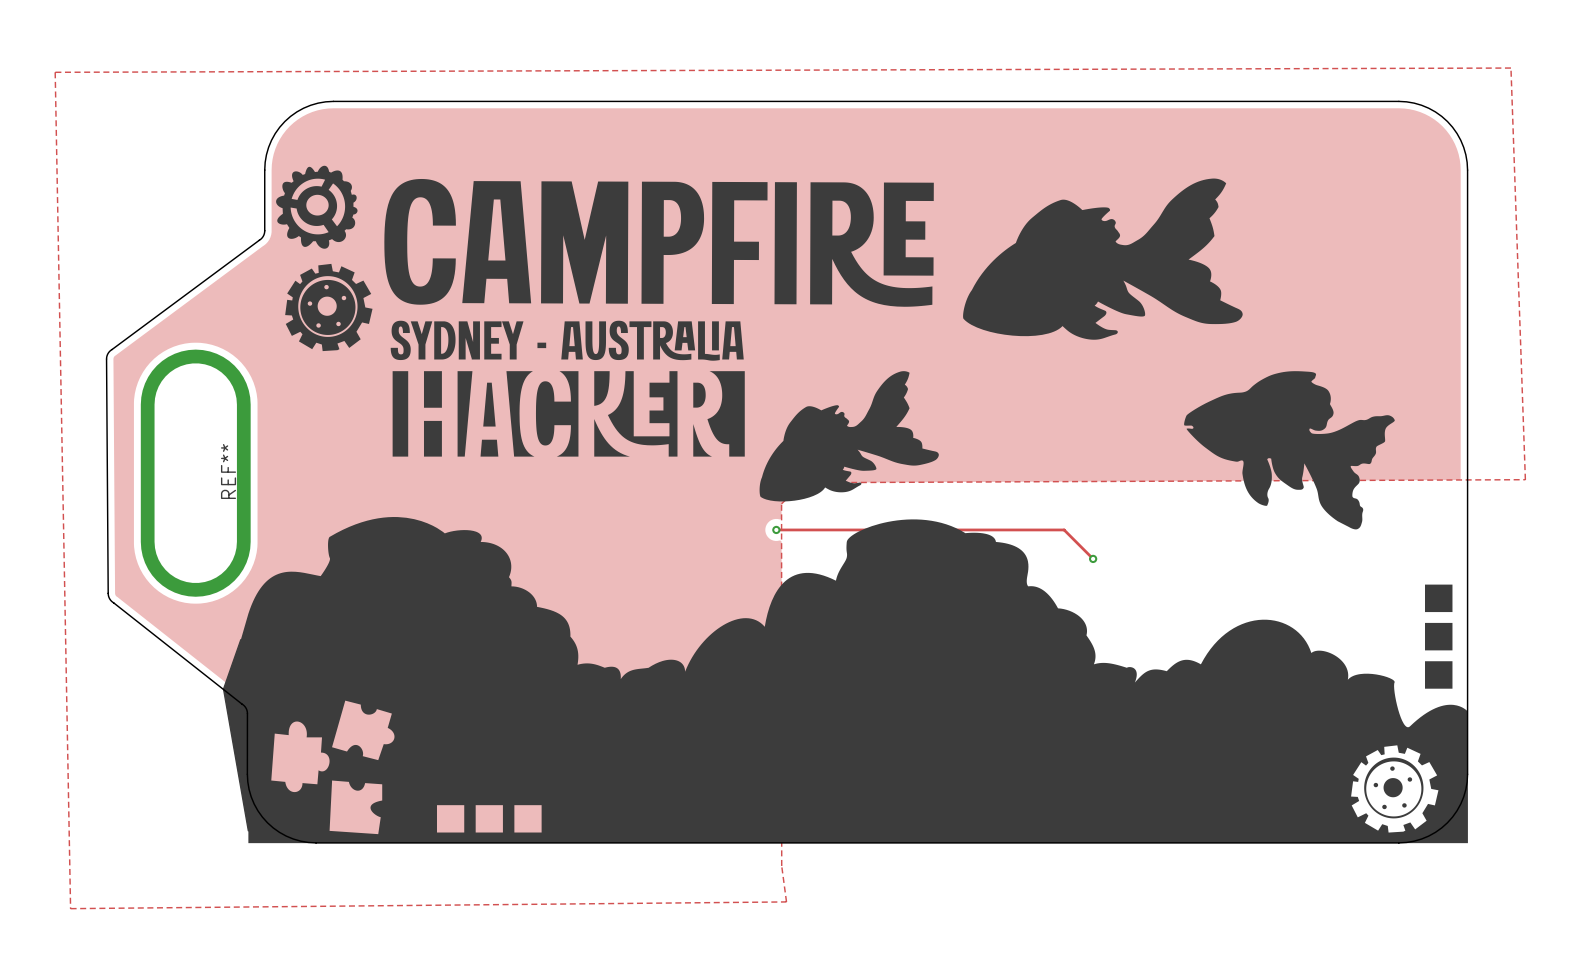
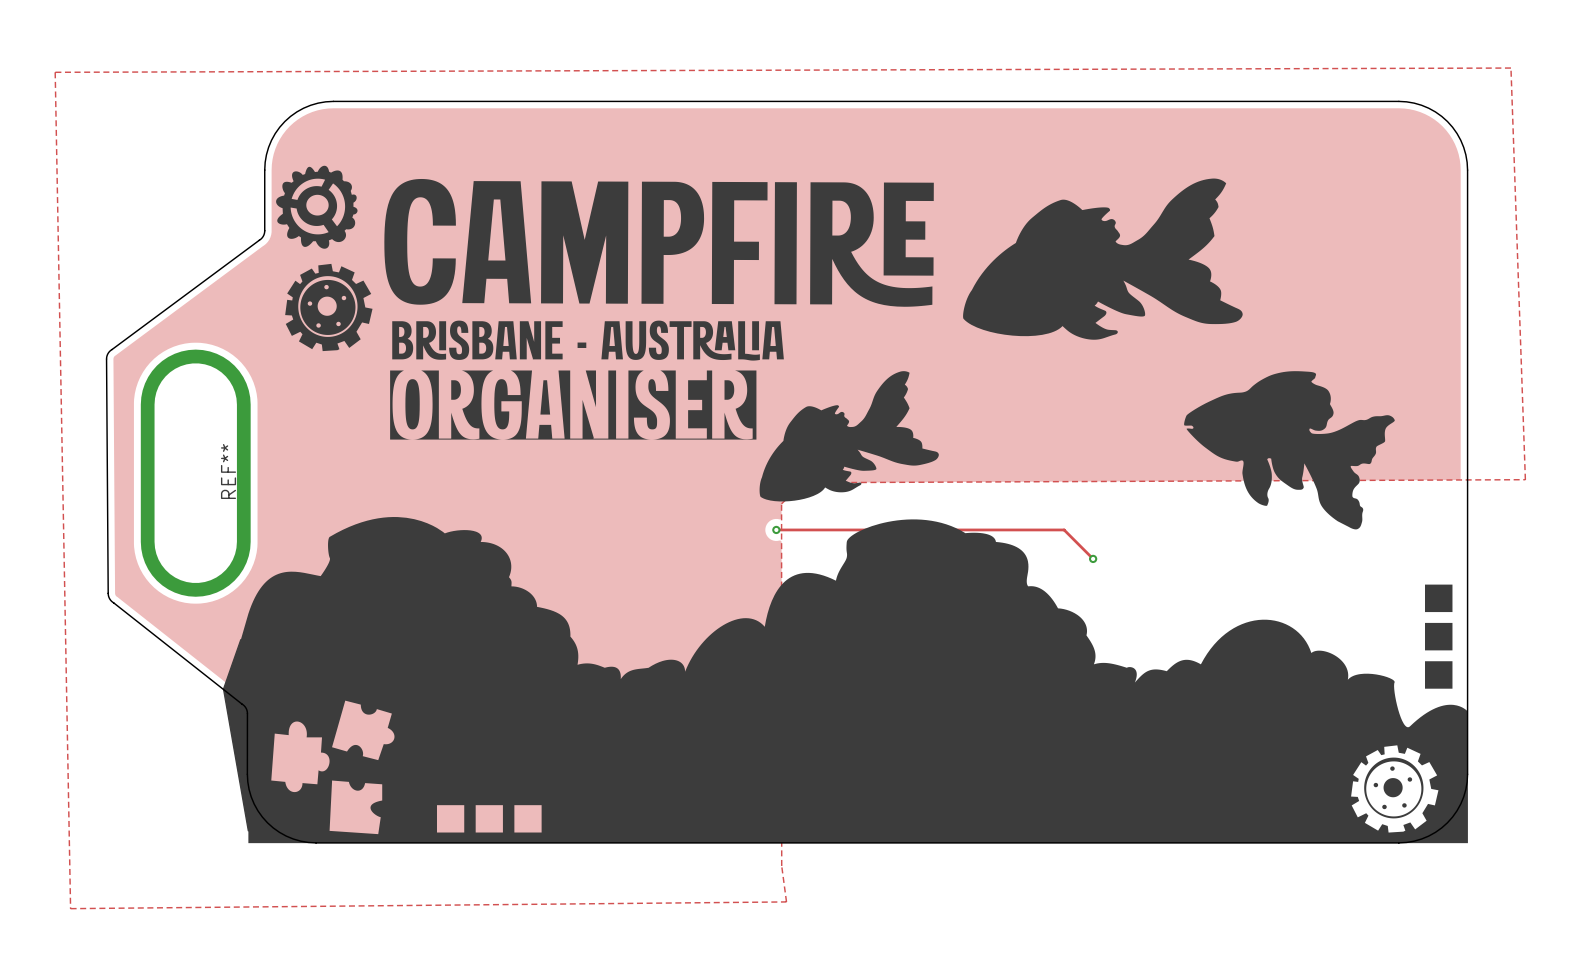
drawing: none -> [390, 321, 447, 440]
drawing: [392, 321, 442, 457] -> none
drawing shape: [434, 321, 456, 360] -> [439, 321, 447, 351]
drawing: none -> [472, 321, 658, 440]
drawing: [480, 321, 745, 457] -> none
drawing shape: [501, 321, 524, 360] -> [495, 321, 517, 360]
drawing position: (684, 335) -> (725, 335)
drawing position: (715, 335) -> (755, 335)
drawing position: (400, 340) -> (459, 340)
drawing position: (469, 340) -> (530, 340)
drawing position: (492, 340) -> (553, 340)
drawing position: (595, 340) -> (635, 340)
drawing position: (618, 340) -> (658, 340)
drawing position: (640, 340) -> (680, 340)
drawing position: (672, 340) -> (712, 340)
drawing position: (732, 340) -> (773, 340)
drawing position: (708, 341) -> (749, 340)
drawing position: (541, 345) -> (581, 345)
drawing shape: [457, 371, 473, 457] -> [412, 370, 503, 440]
drawing shape: [594, 371, 610, 406] -> [585, 370, 596, 408]
drawing: none -> [451, 380, 461, 400]
drawing: none -> [724, 380, 735, 400]
drawing shape: [693, 382, 706, 408] -> [648, 370, 757, 440]

